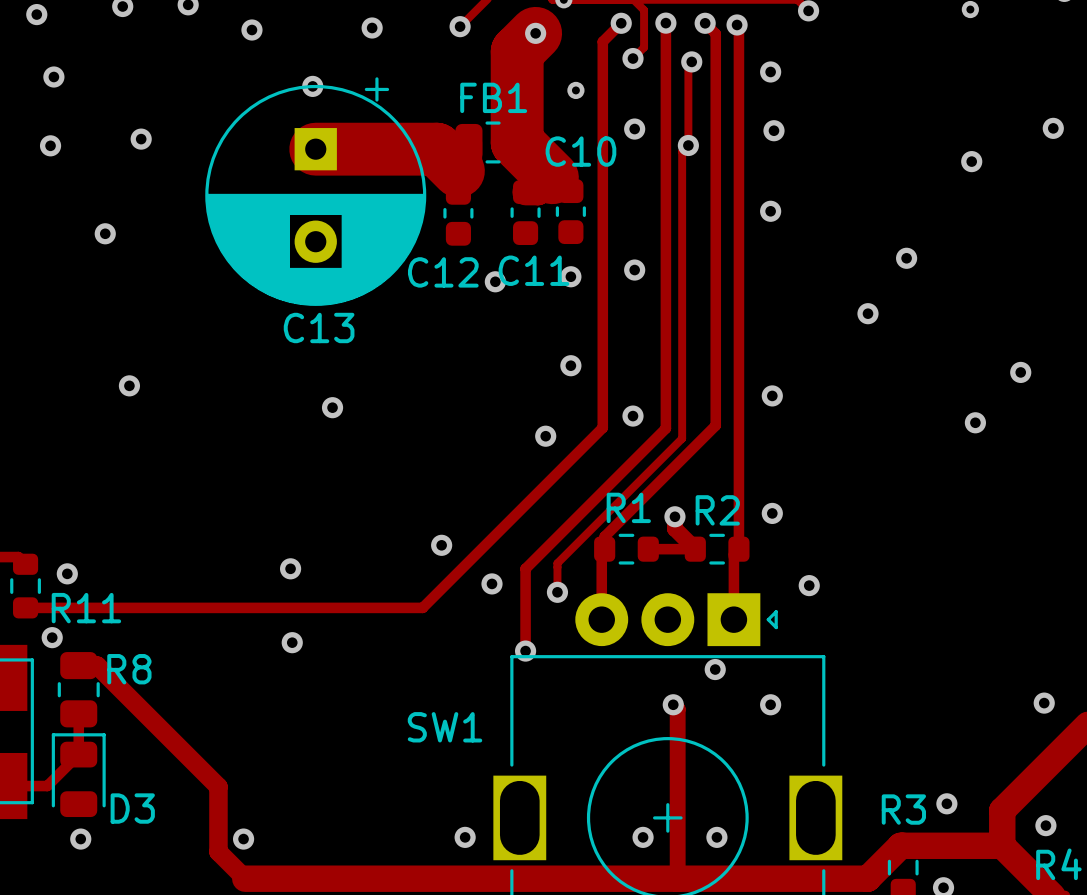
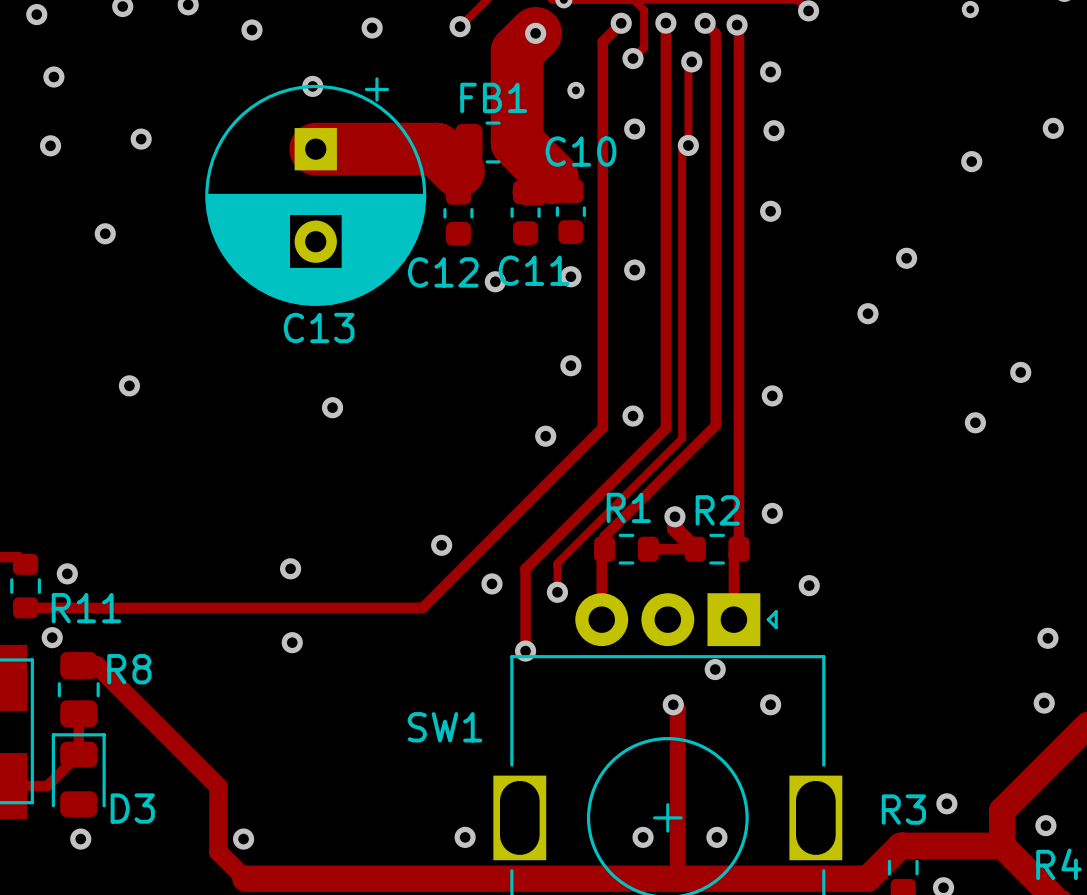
via: none -> (1047, 638)

